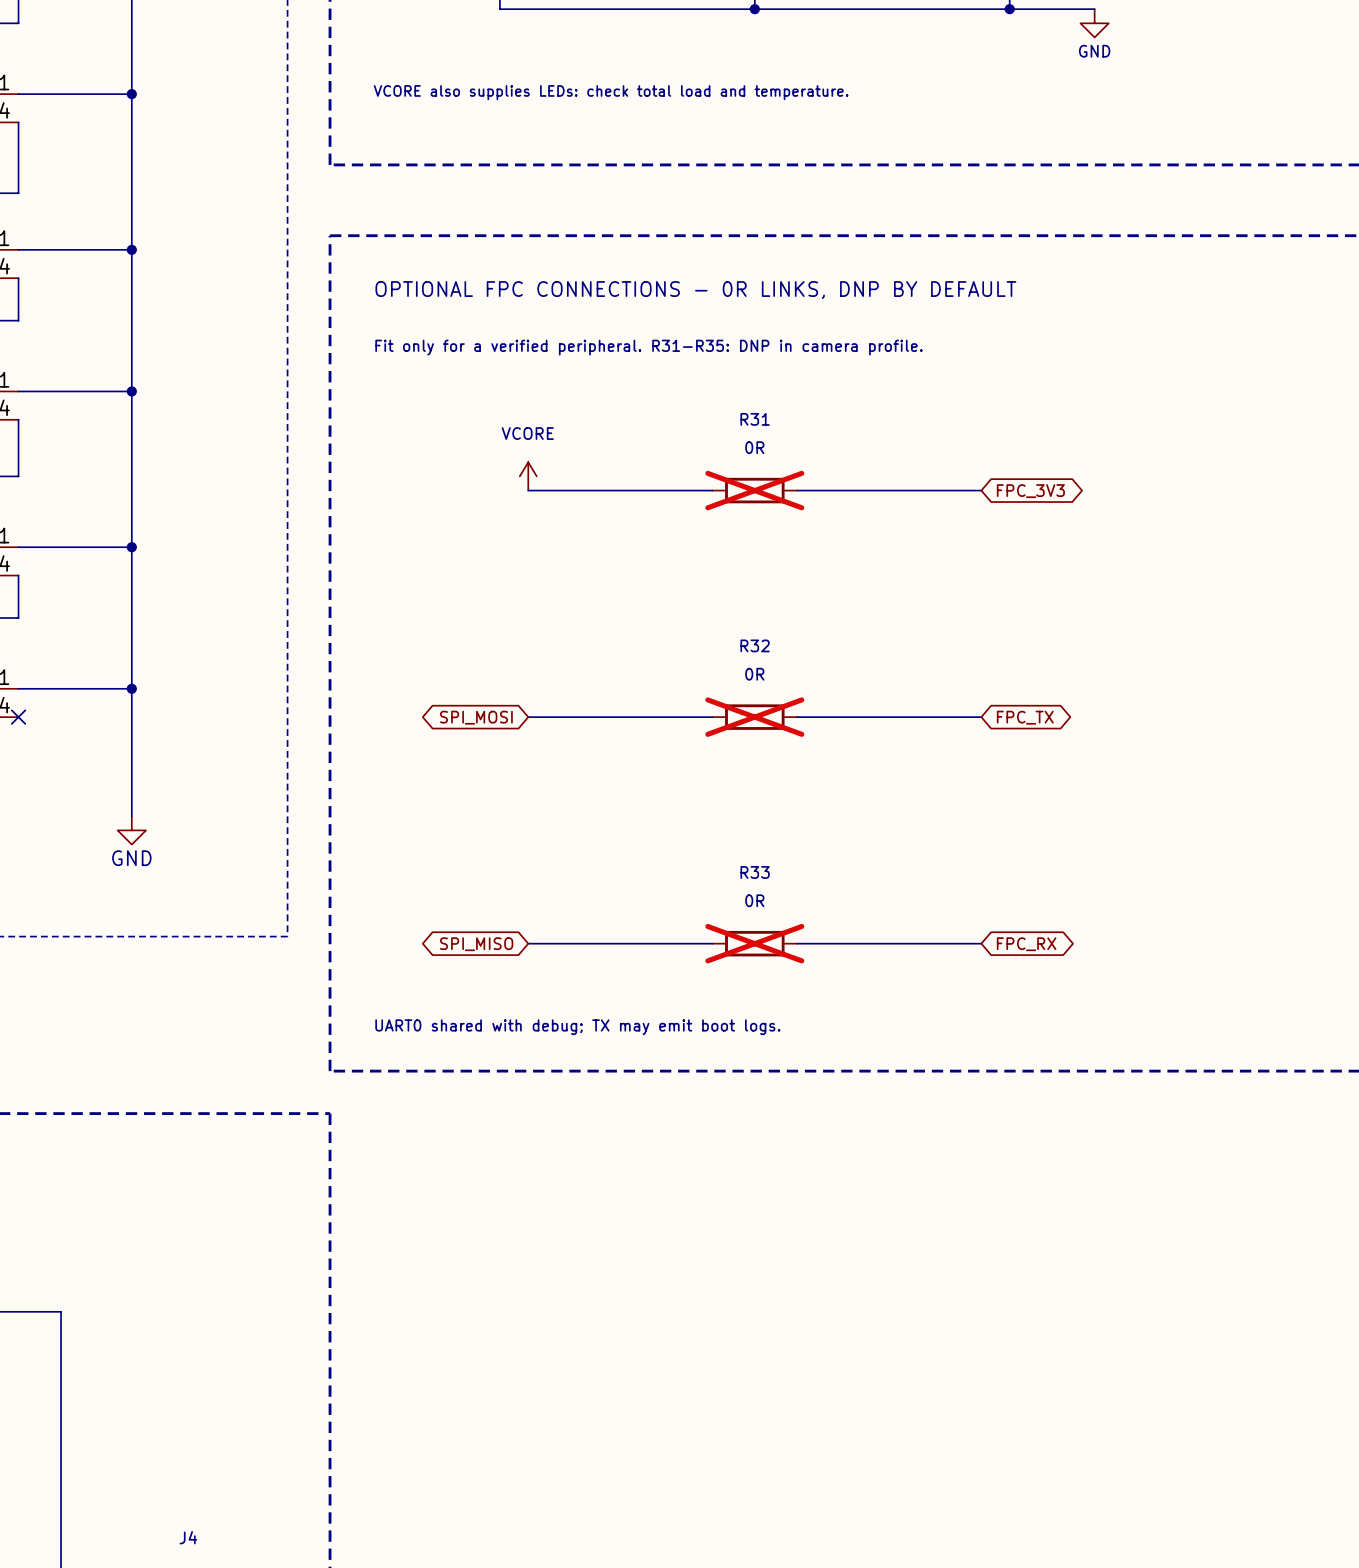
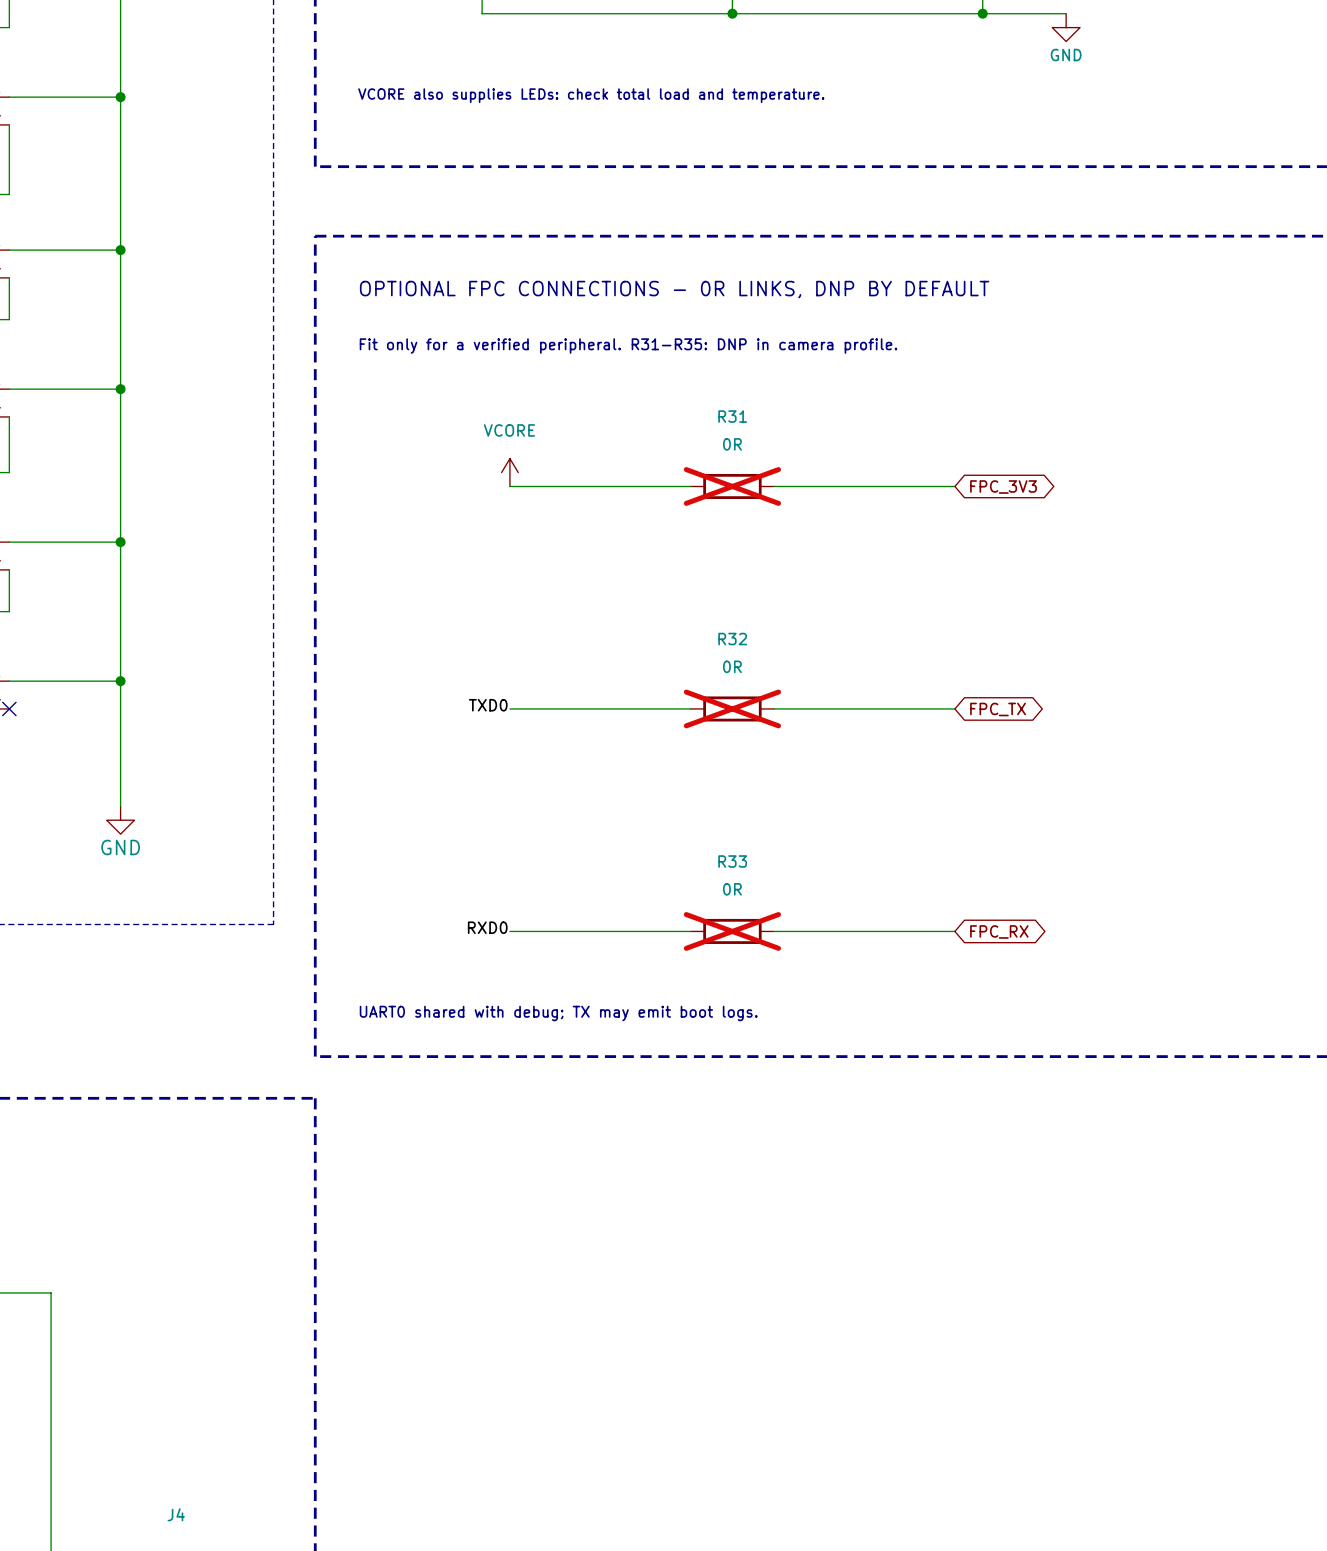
label: none -> TXD0 (488, 705)
global label: SPI_MOSI (476, 717) -> none
label: none -> RXD0 (487, 927)
global label: SPI_MISO (476, 944) -> none

